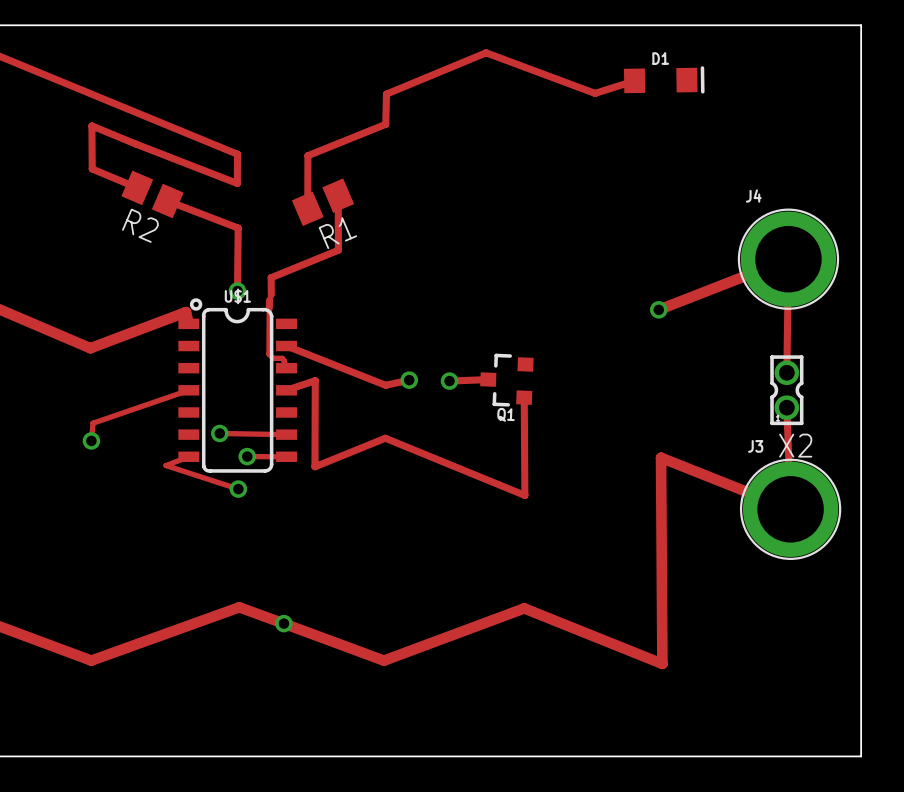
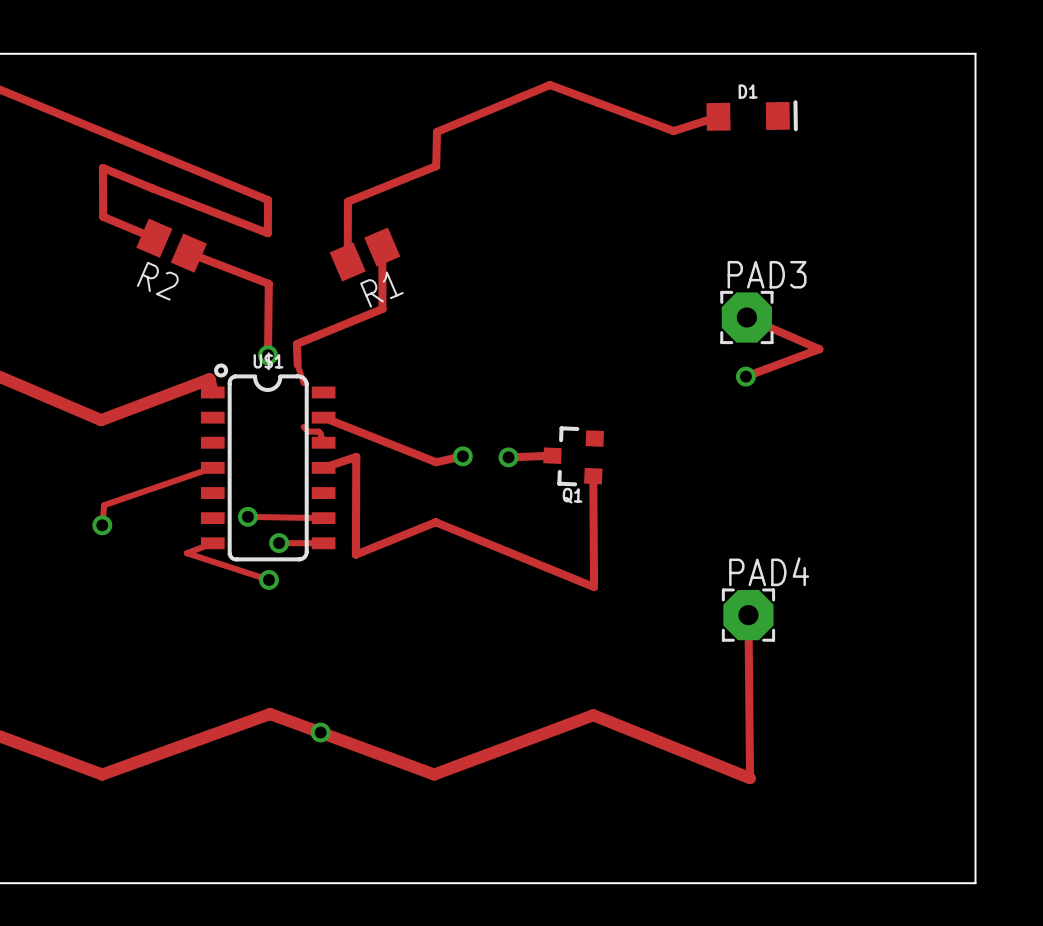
track: (338, 250) (271, 277) (268, 354) -> (382, 308) (296, 344) (297, 364) (303, 383)
PAD3: none -> (746, 317)
J4: (788, 259) -> none
track: (658, 309) (788, 259) (786, 372) -> (745, 376) (819, 349) (746, 317)
X2: (786, 390) -> none
track: (786, 407) (790, 509) (661, 457) (662, 663) -> (748, 615) (750, 778)
J3: (790, 509) -> none
PAD4: none -> (748, 615)

